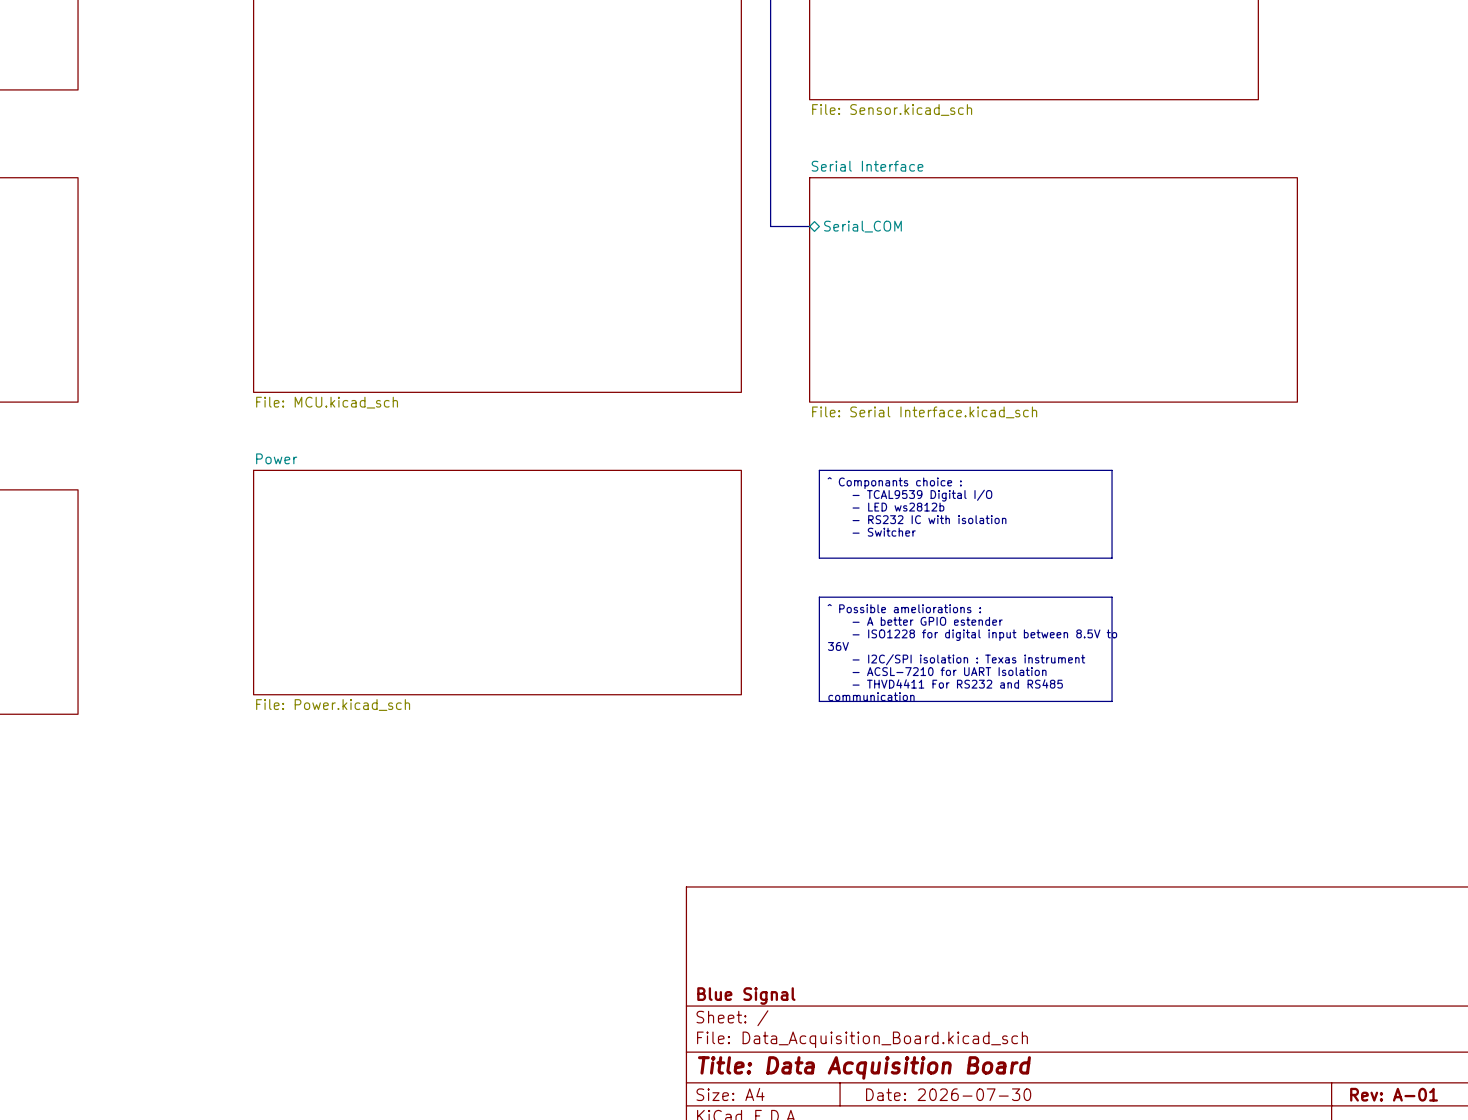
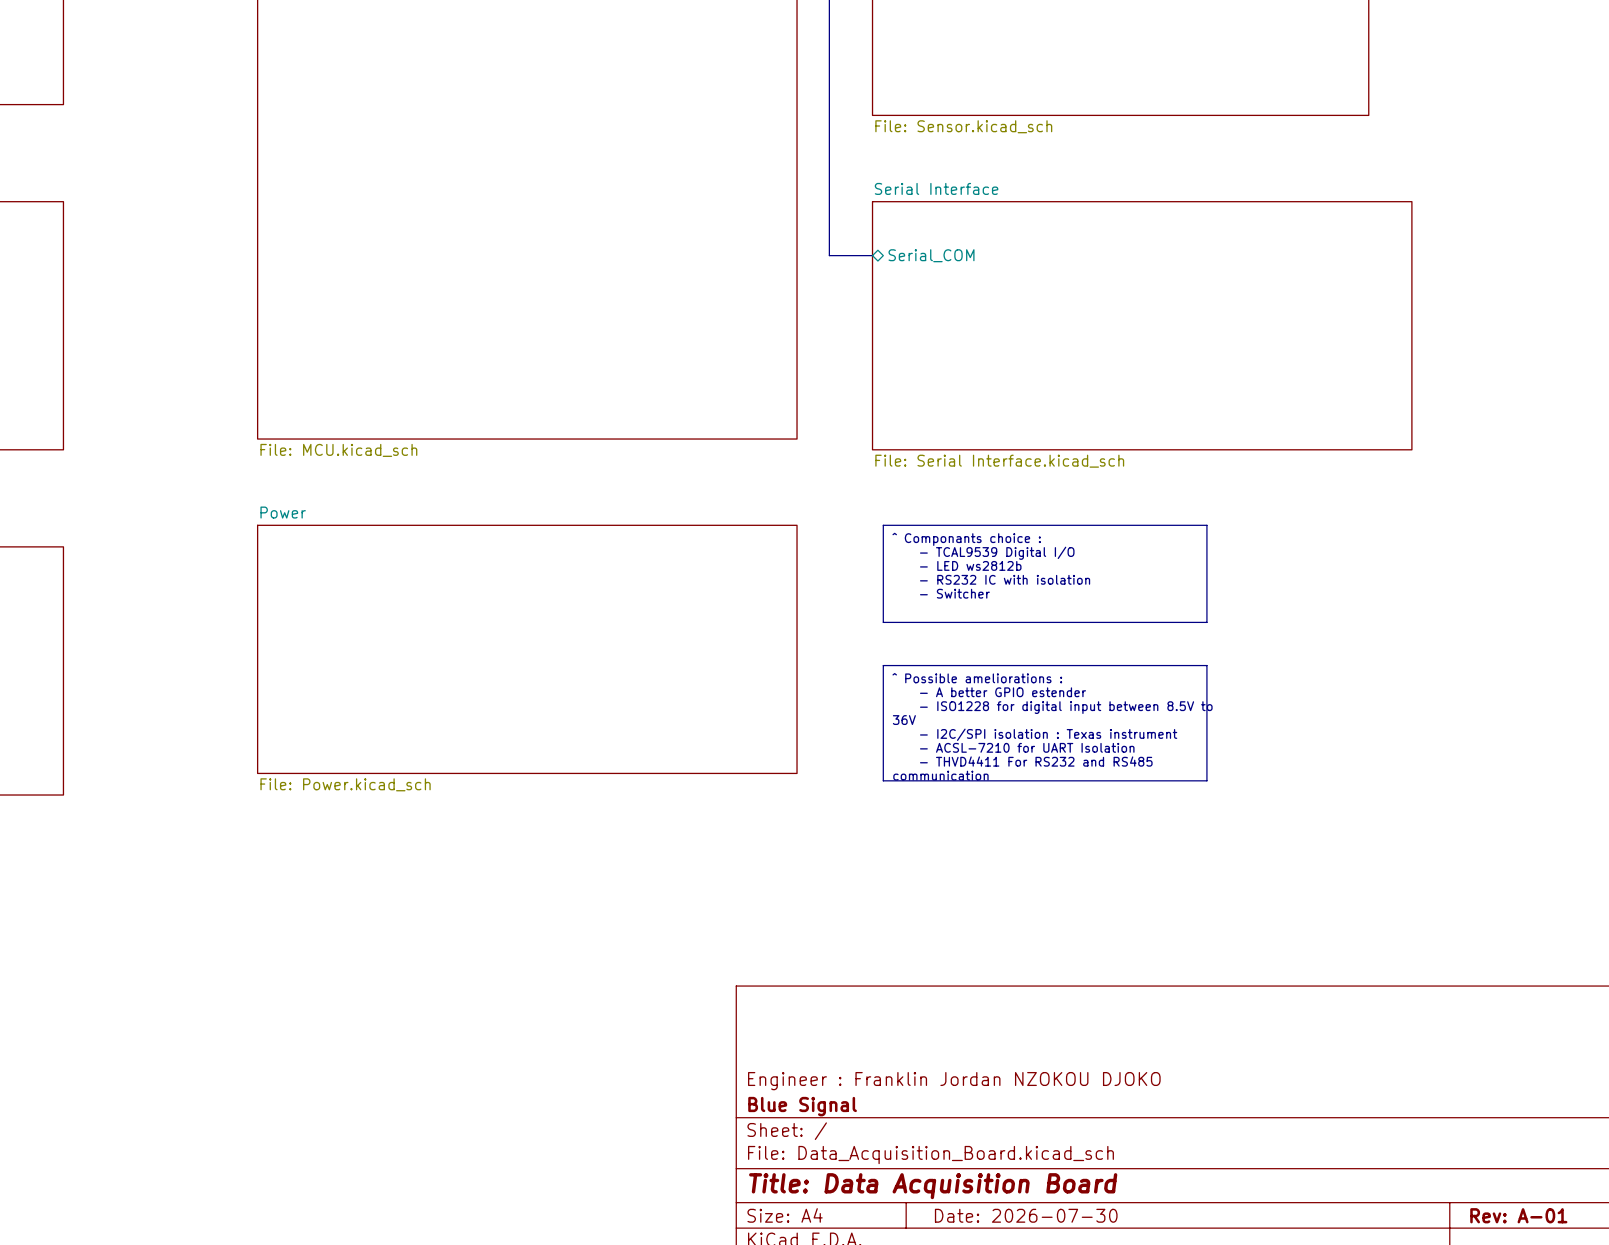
title block: none -> Engineer : Franklin Jordan NZOKOU DJOKO (954, 1081)

